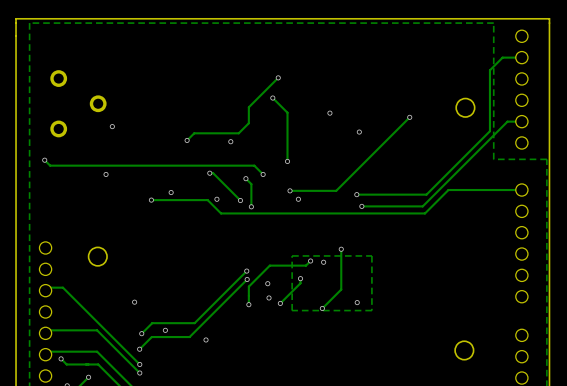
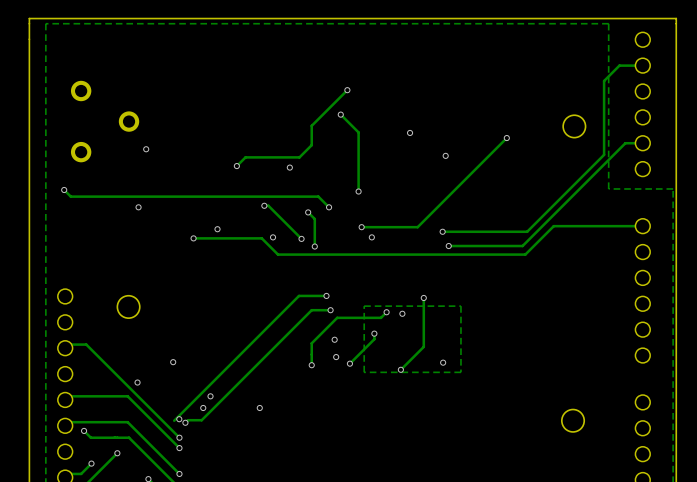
track: none -> (326, 295) (299, 295) (174, 420)
via: none -> (326, 295)
track: none -> (330, 310) (311, 310) (201, 420) (187, 420) (185, 422)
via: none -> (330, 310)
track: (246, 271) (194, 323) (152, 323) (141, 333) -> none
via: (246, 271) -> none
track: (247, 279) (189, 337) (151, 337) (139, 349) -> none
via: (247, 279) -> none
via: none -> (137, 382)
via: (141, 333) -> none
via: none -> (203, 408)
via: none -> (185, 422)

